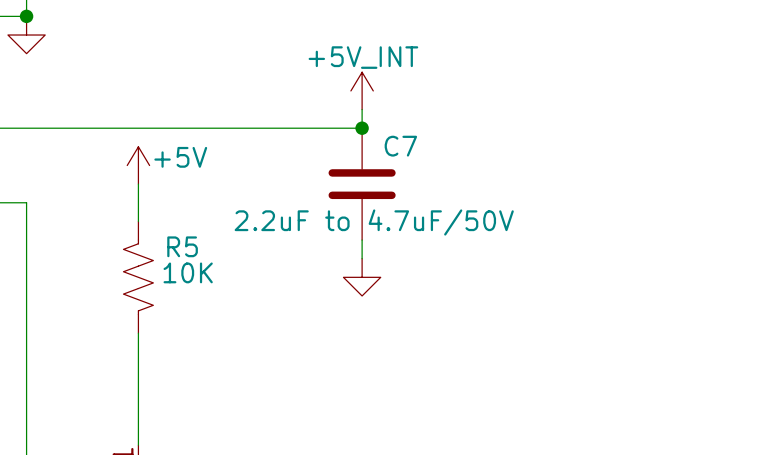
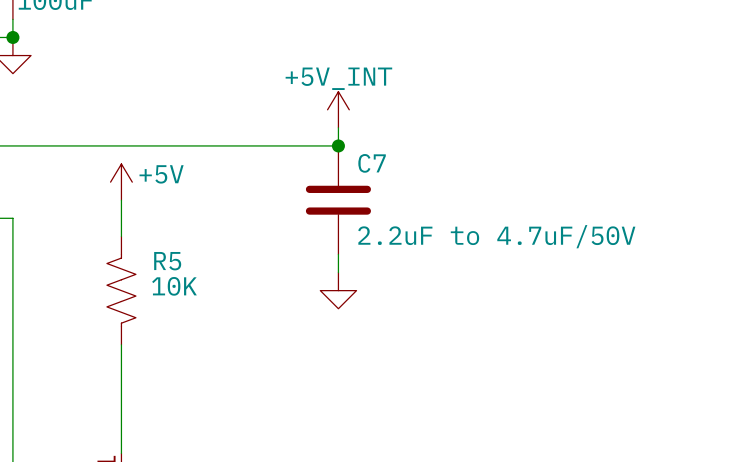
C7 value position: 2.2uF to 4.7uF/50V (374, 222) -> 2.2uF to 4.7uF/50V (496, 236)

